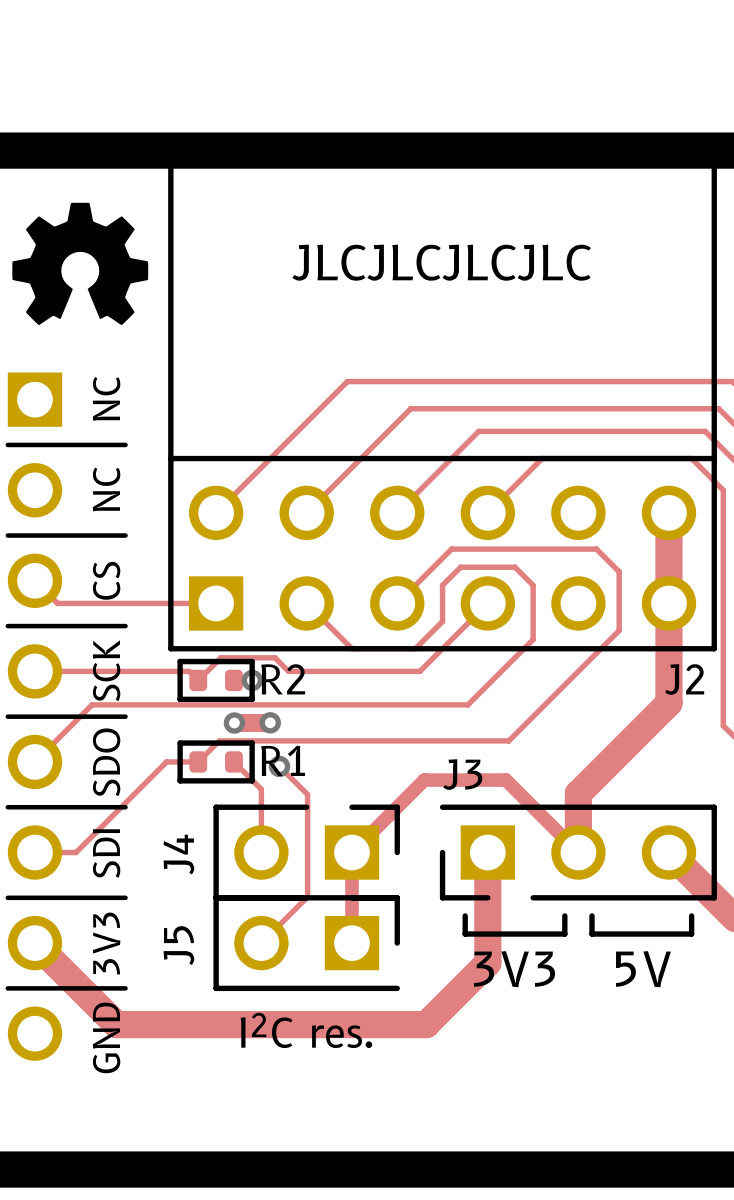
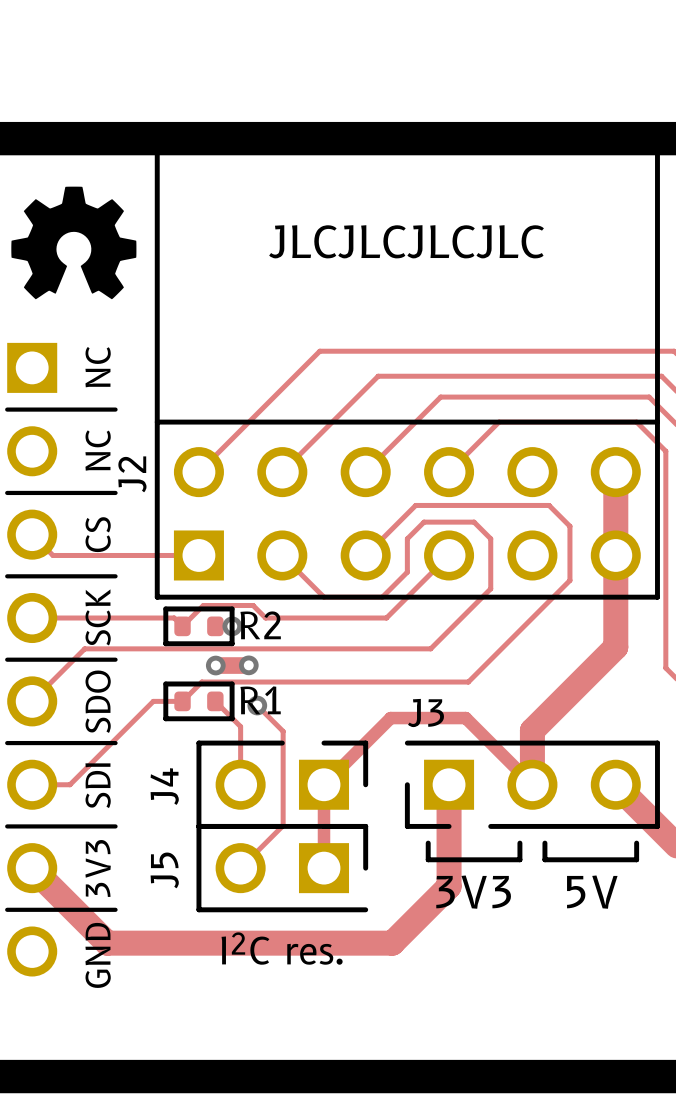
J2 name rotation: 0° (684, 679) -> 90° counterclockwise (132, 474)
J2 name position: J2 (684, 679) -> J2 (132, 474)

